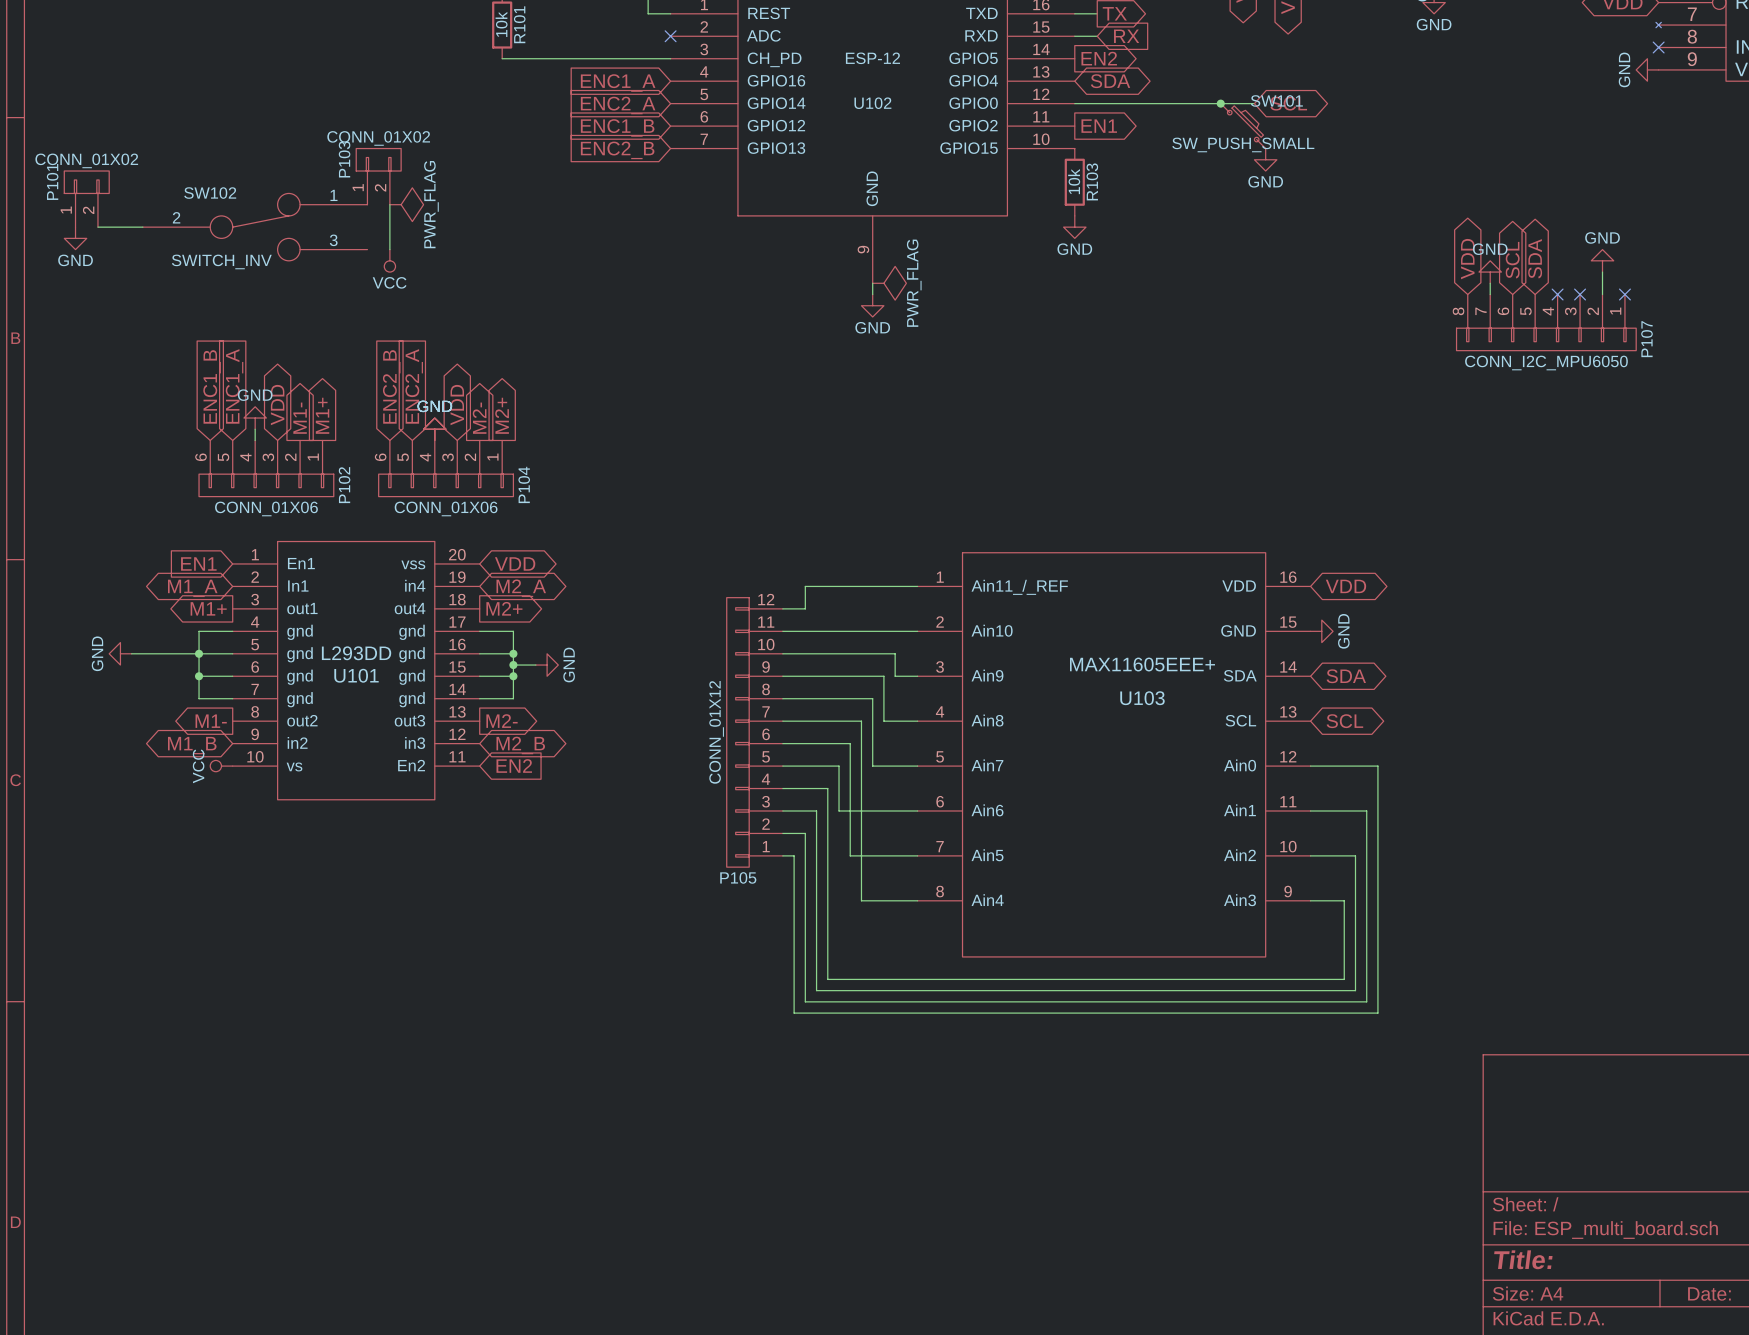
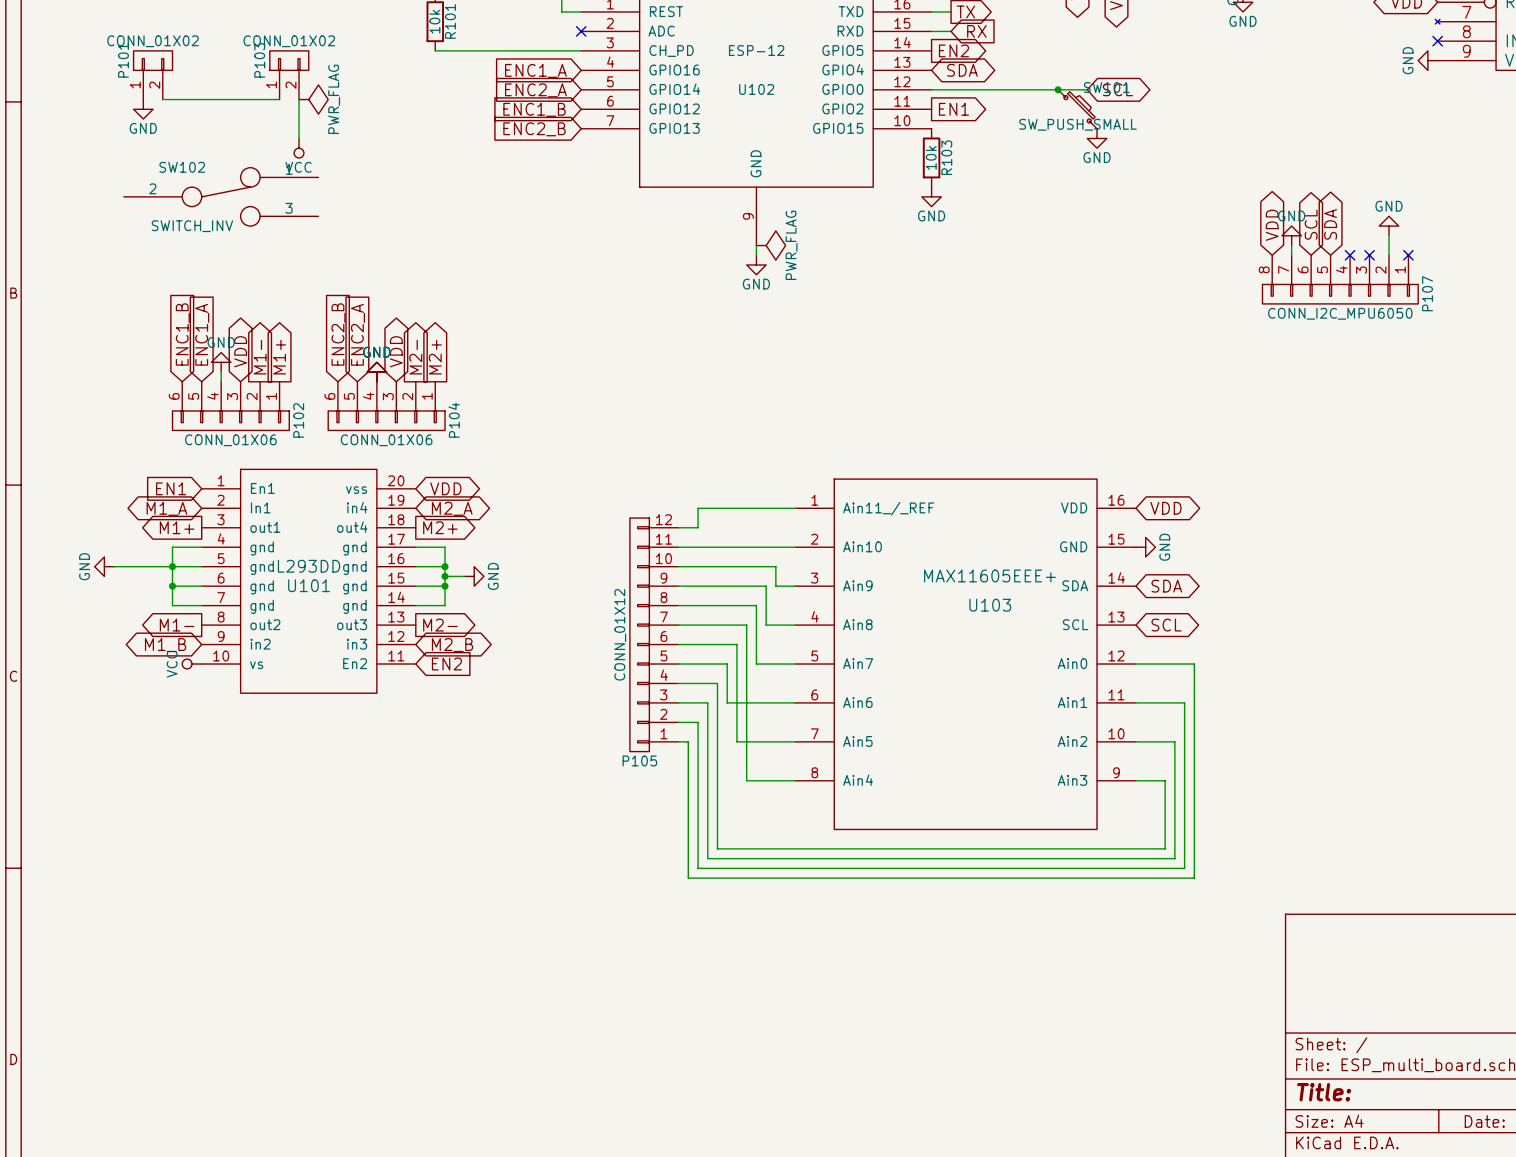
wire: none -> (162, 99) (279, 99)
P103 position: (378, 176) -> (289, 75)
P101 position: (86, 199) -> (153, 75)
wire: (389, 204) (389, 249) -> (299, 99) (299, 138)
power symbol position: PWR_FLAG (406, 204) -> PWR_FLAG (313, 99)
wire: (97, 227) (142, 227) -> none
power symbol position: GND (75, 238) -> GND (143, 109)
power symbol position: VCC (389, 260) -> VCC (299, 148)

